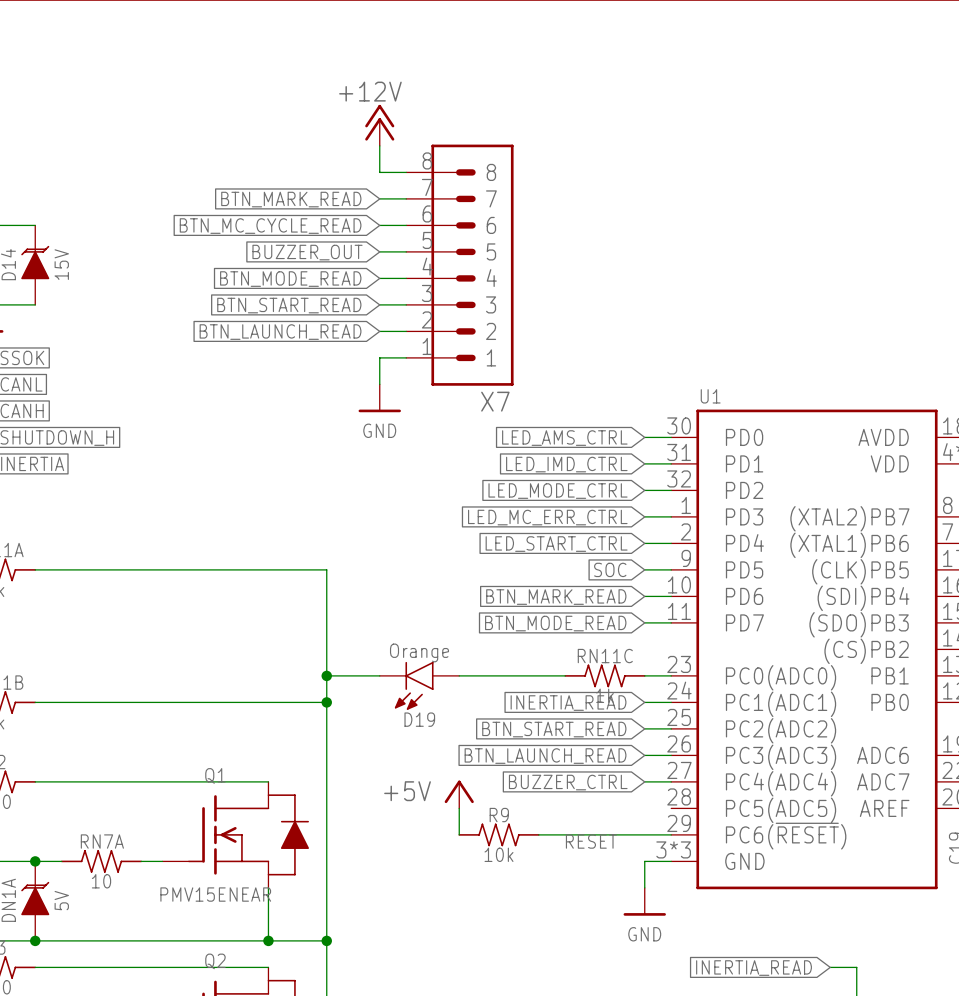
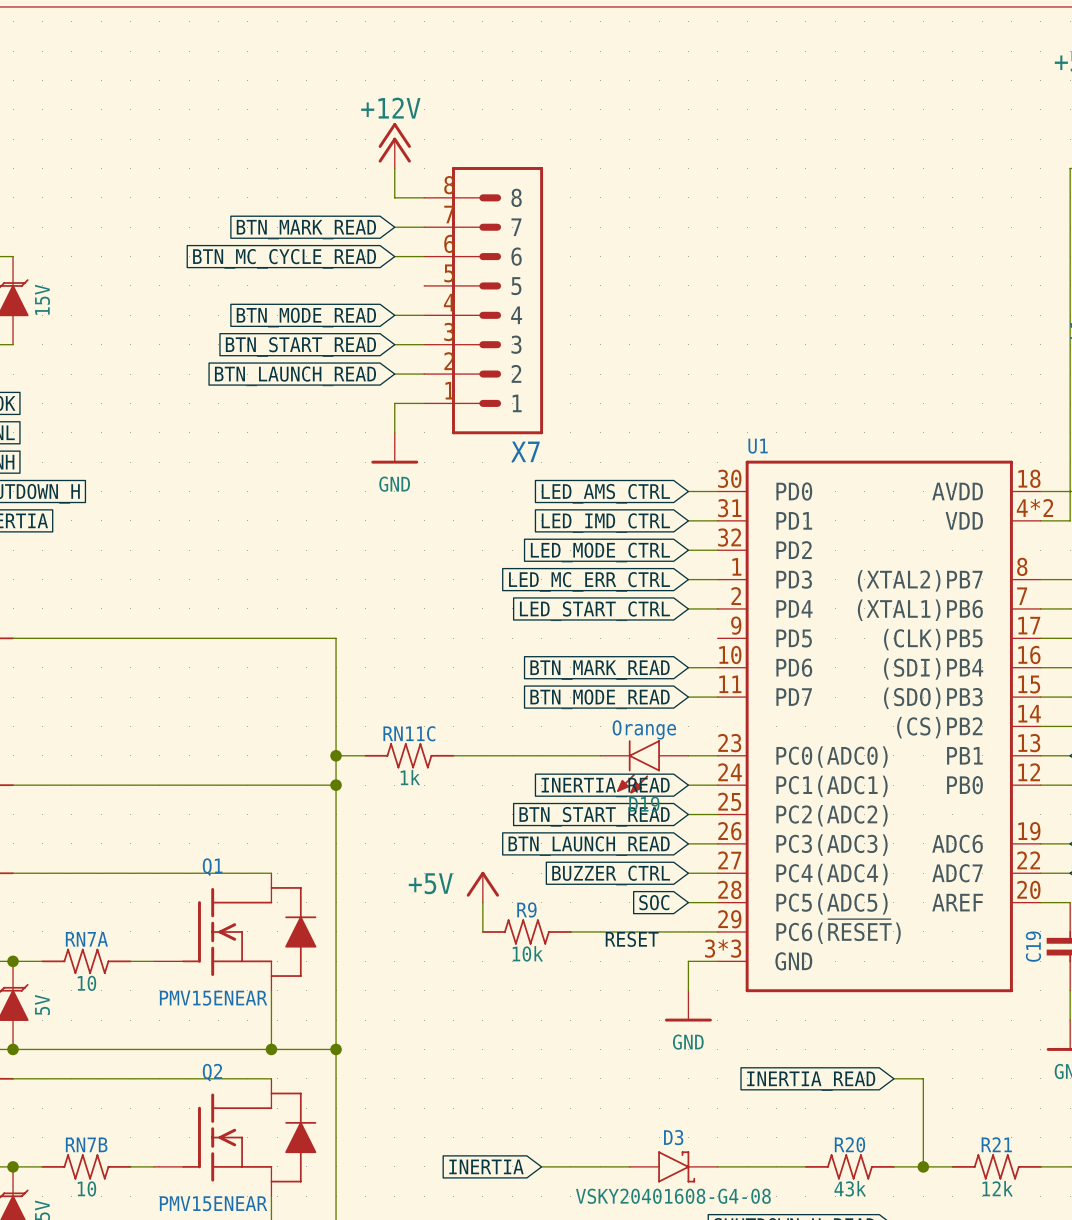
wire: (379, 251) (406, 251) -> none
global label: BUZZER_OUT (307, 252) -> none
global label position: SOC (610, 569) -> SOC (654, 902)
wire: (644, 569) (671, 569) -> (688, 902) (717, 902)
RN11C position: (604, 675) -> (409, 755)
D19 position: (419, 685) -> (644, 766)

